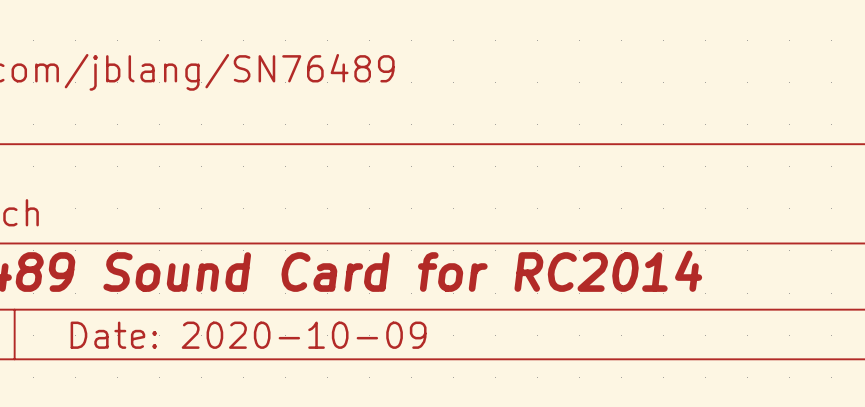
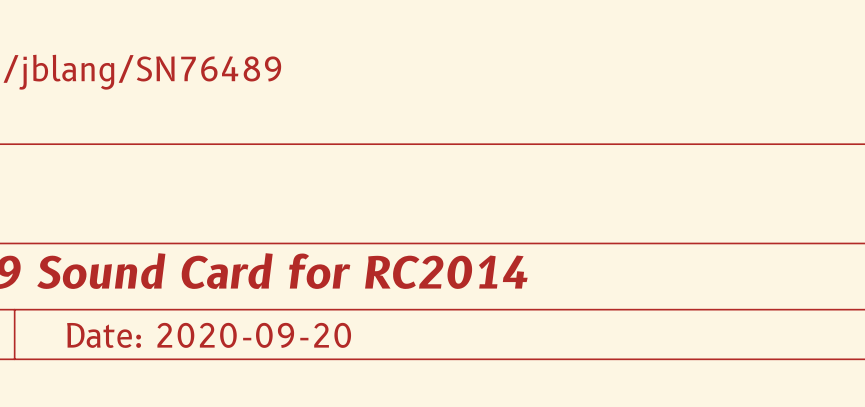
title block: Date: 2020-10-09 (248, 335) -> Date: 2020-09-20 (209, 335)

